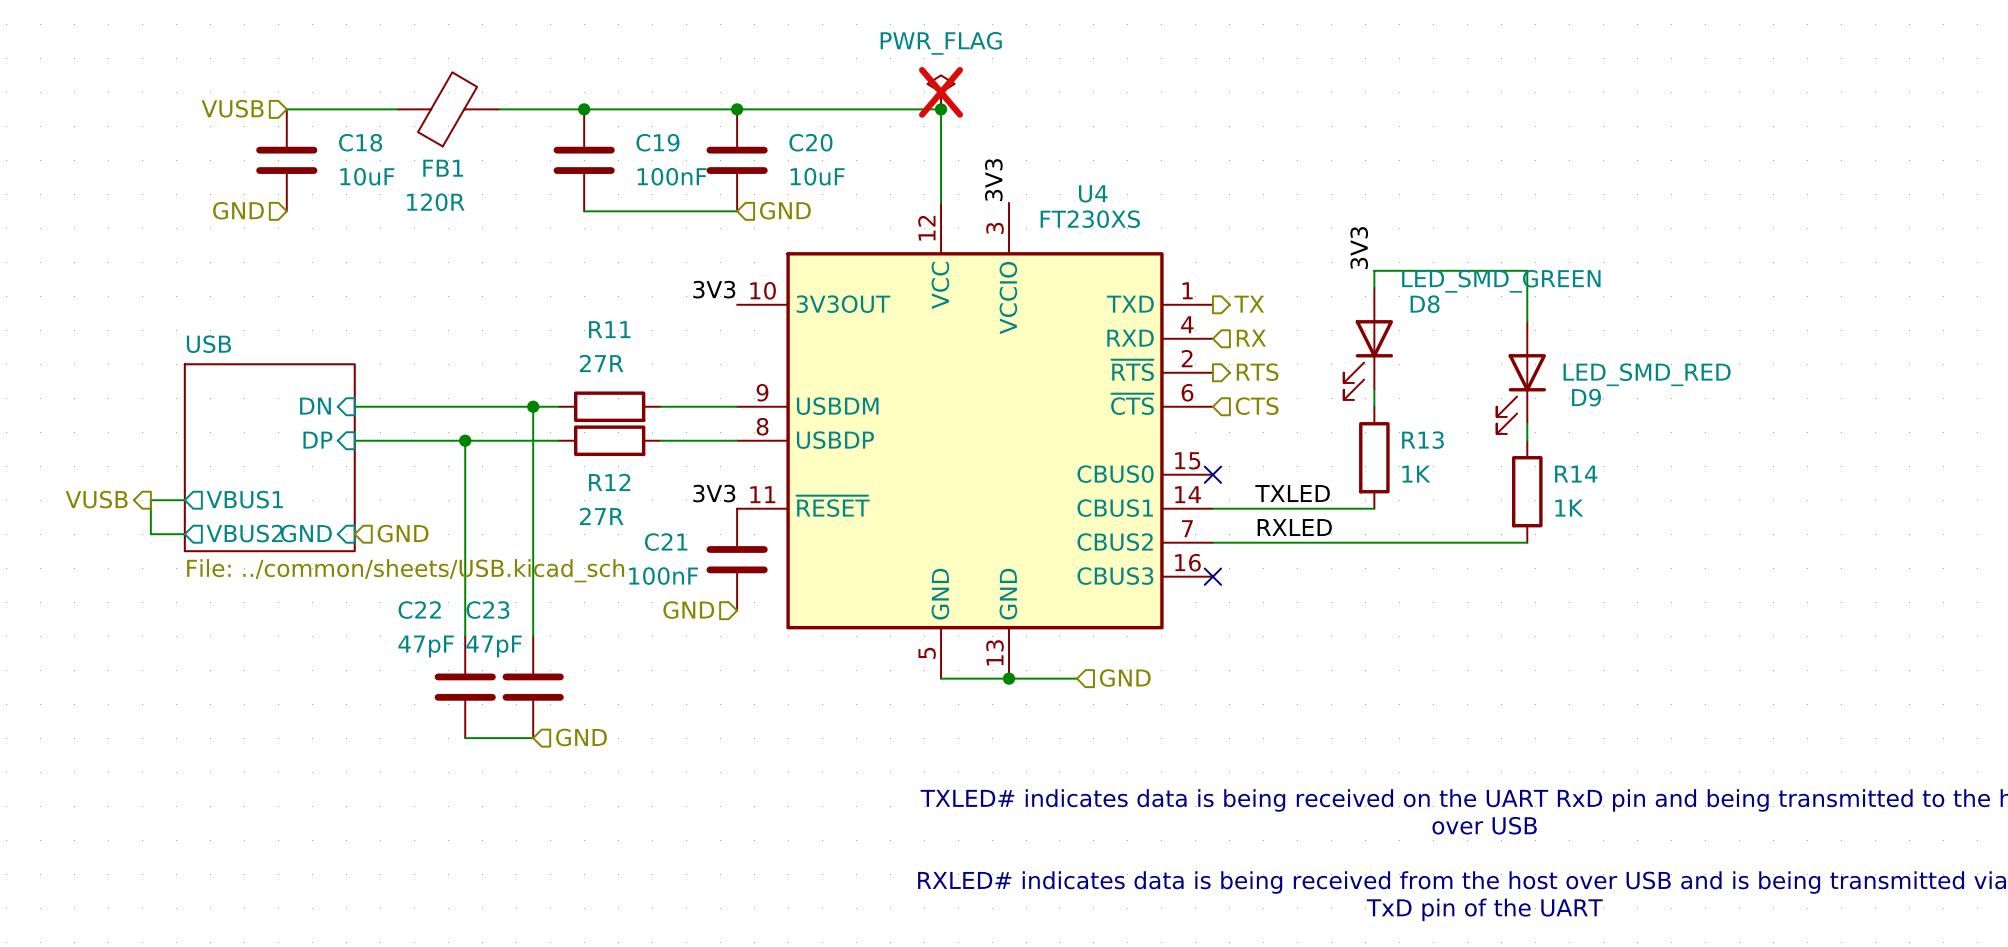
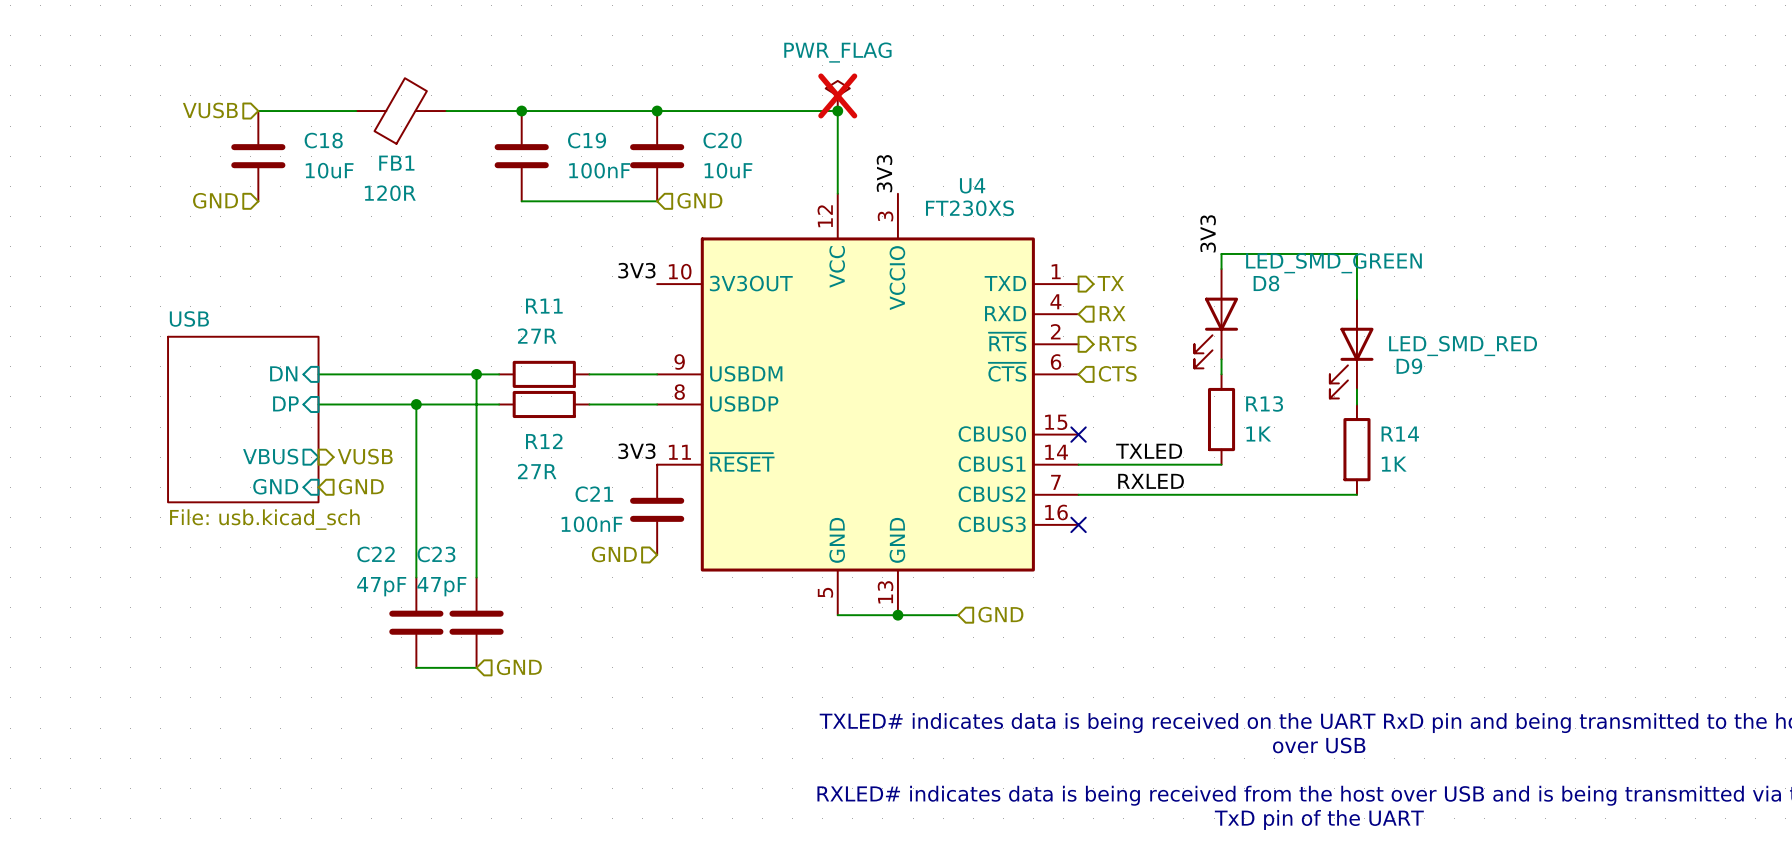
hierarchical label rotation: 0° (96, 499) -> 180° (365, 456)
hierarchical label position: VUSB (96, 499) -> VUSB (365, 456)
sheet pin: VBUS1 (244, 499) -> none
sheet pin: none -> VBUS (270, 456)
wire: (184, 500) (150, 500) (150, 534) (184, 534) -> none
sheet pin: VBUS2 (244, 533) -> none
sheet USB value: File: ../common/sheets/USB.kicad_sch (405, 570) -> File: usb.kicad_sch (264, 519)

